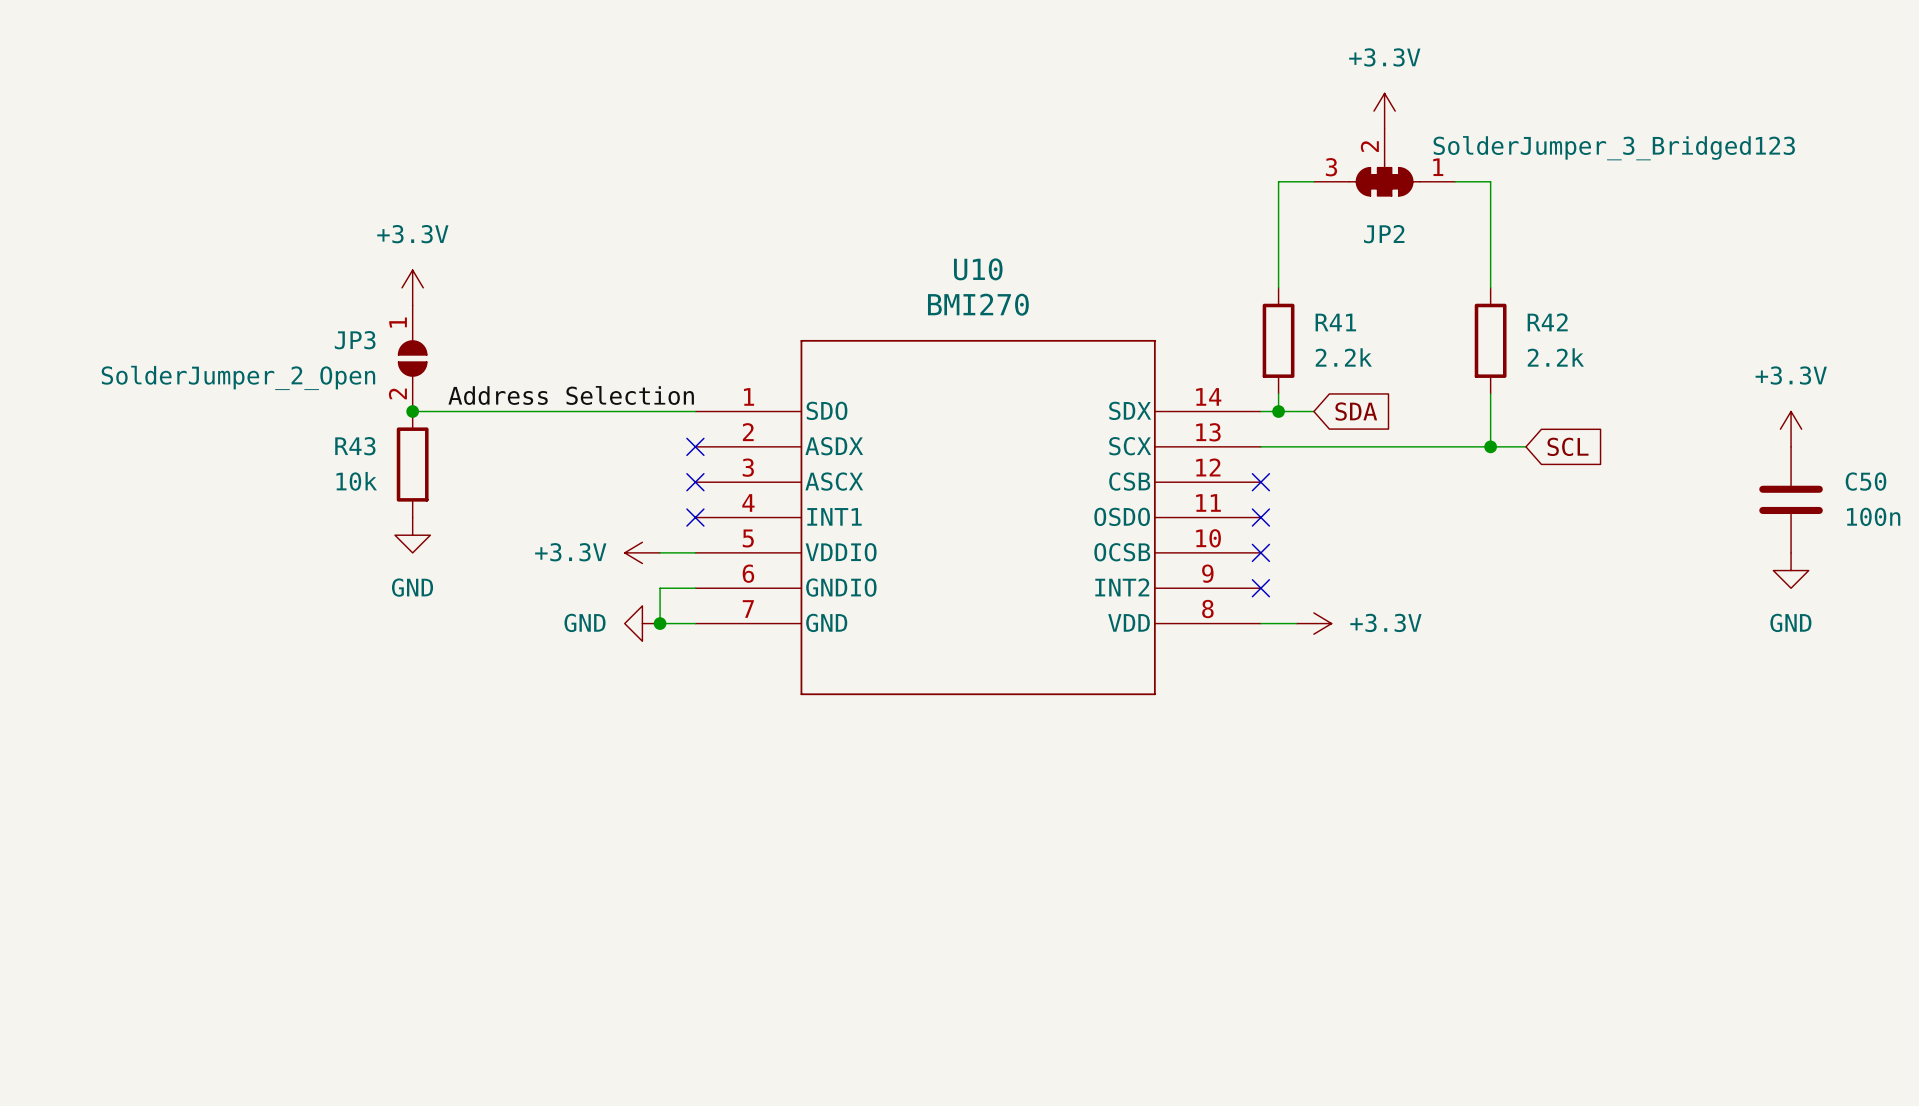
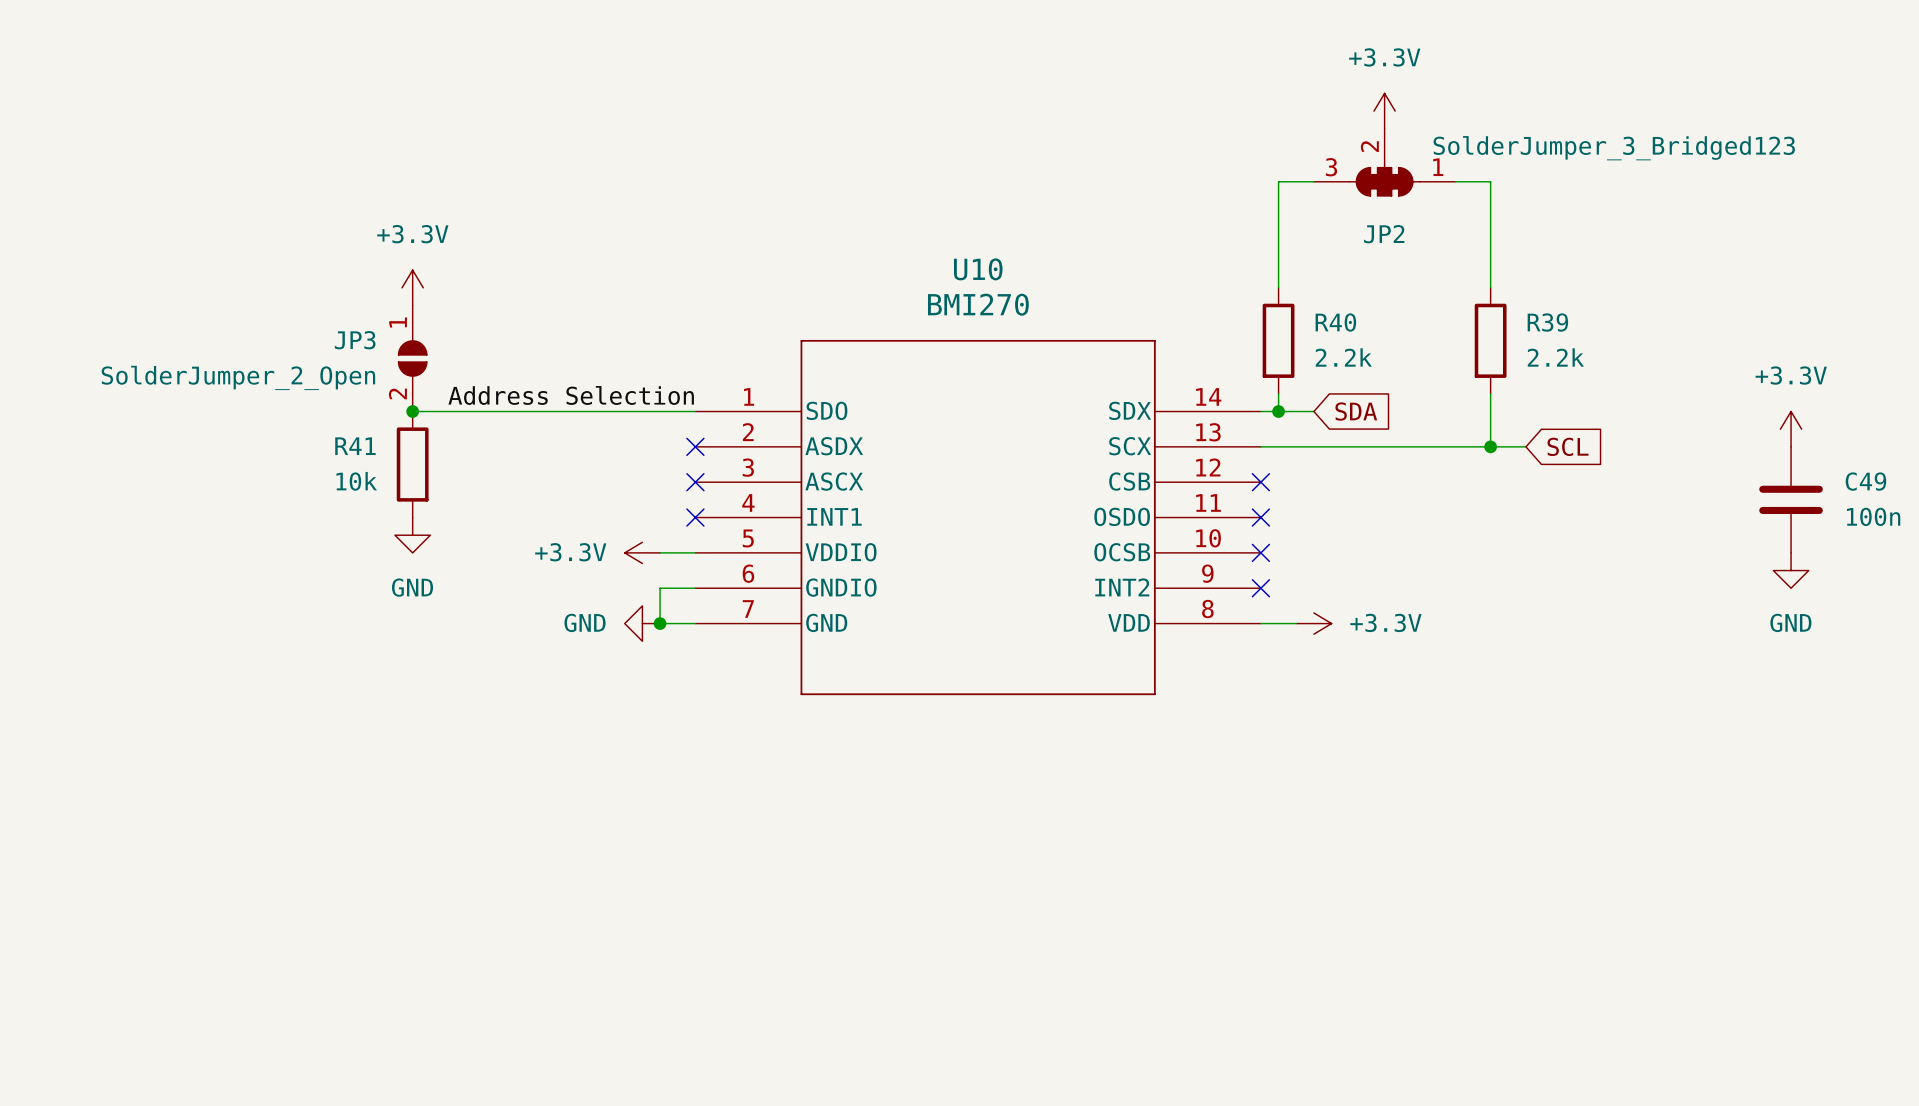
R41 name: R41 (1335, 322) -> R40 (1335, 322)
R42 name: R42 (1547, 322) -> R39 (1547, 322)
R43 name: R43 (355, 446) -> R41 (355, 446)
C50 name: C50 (1865, 481) -> C49 (1865, 481)

